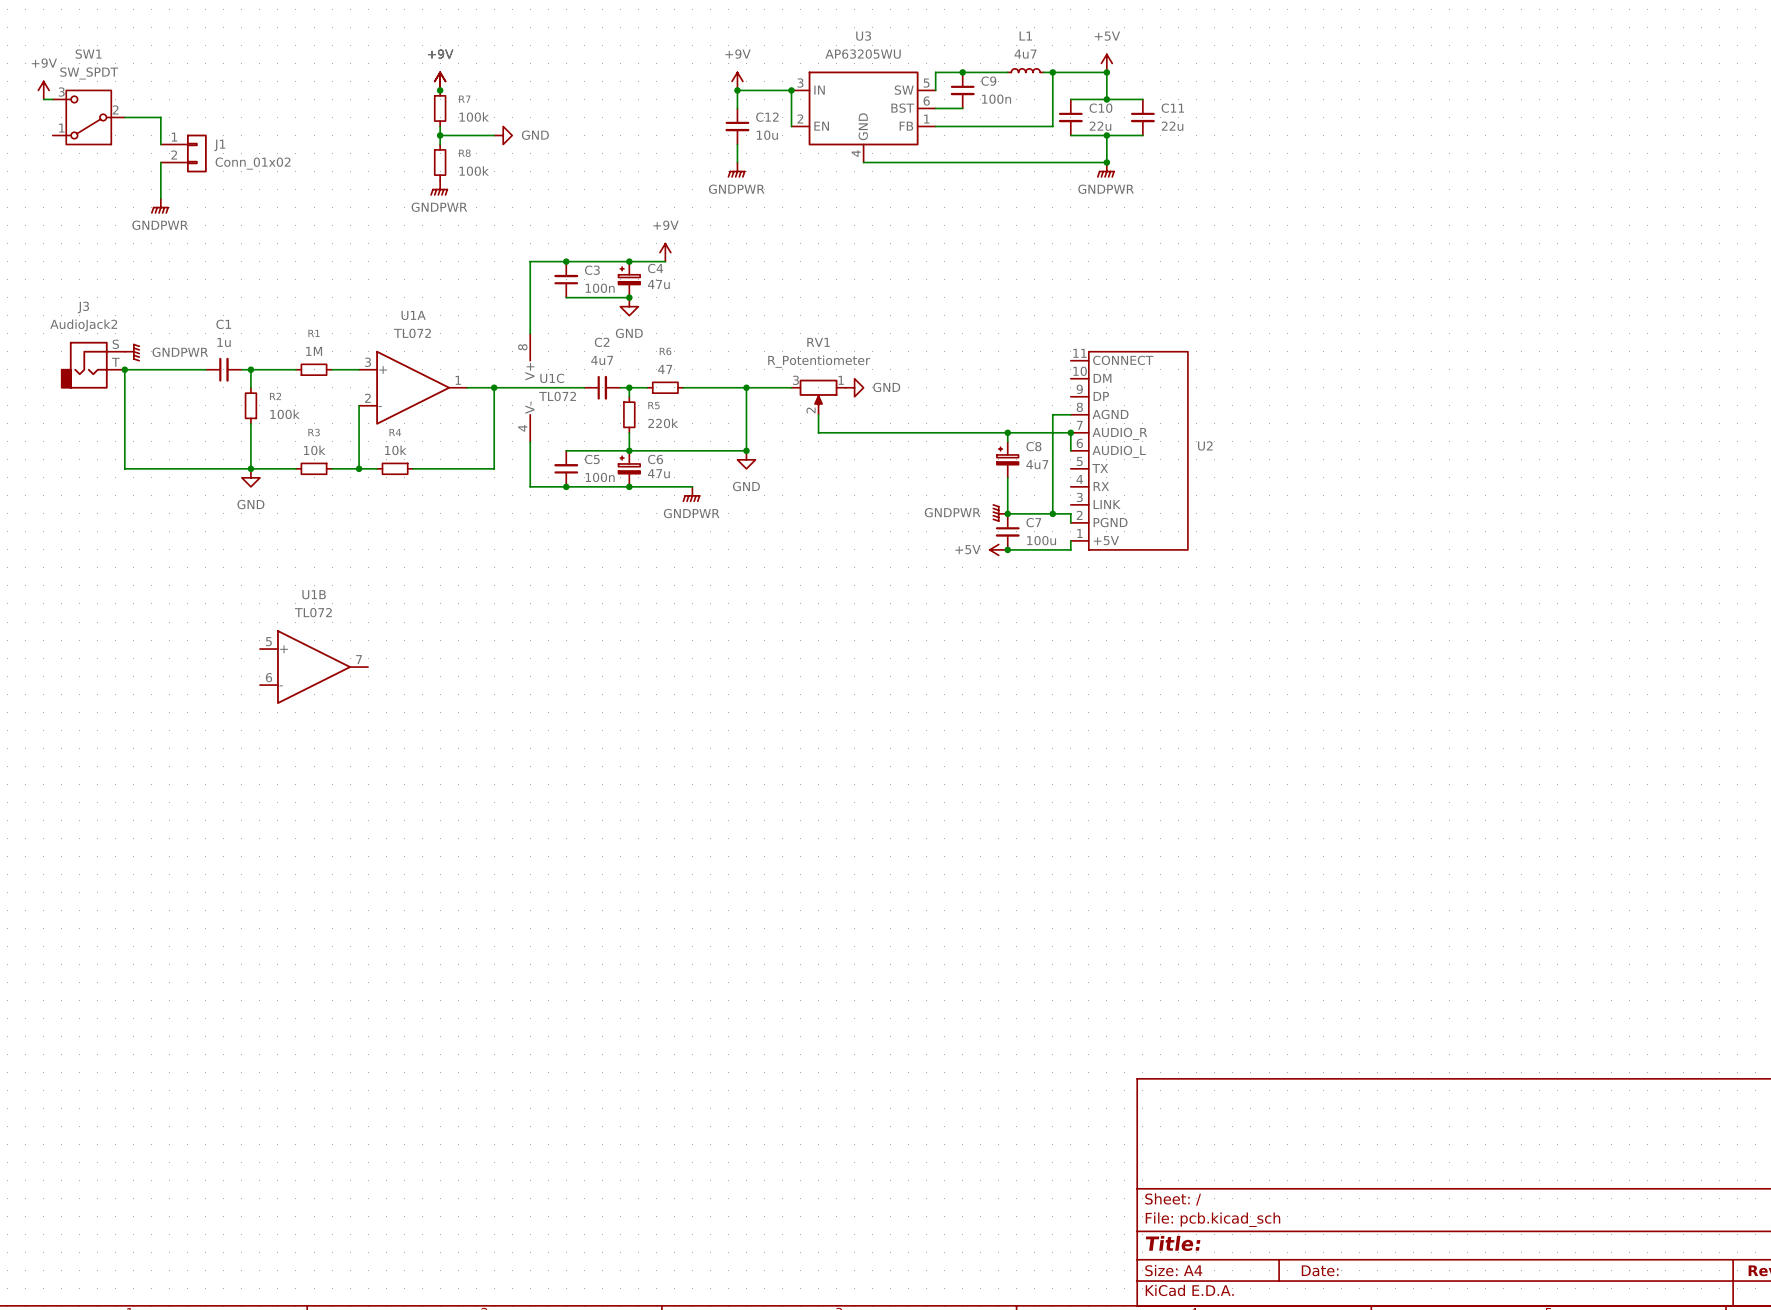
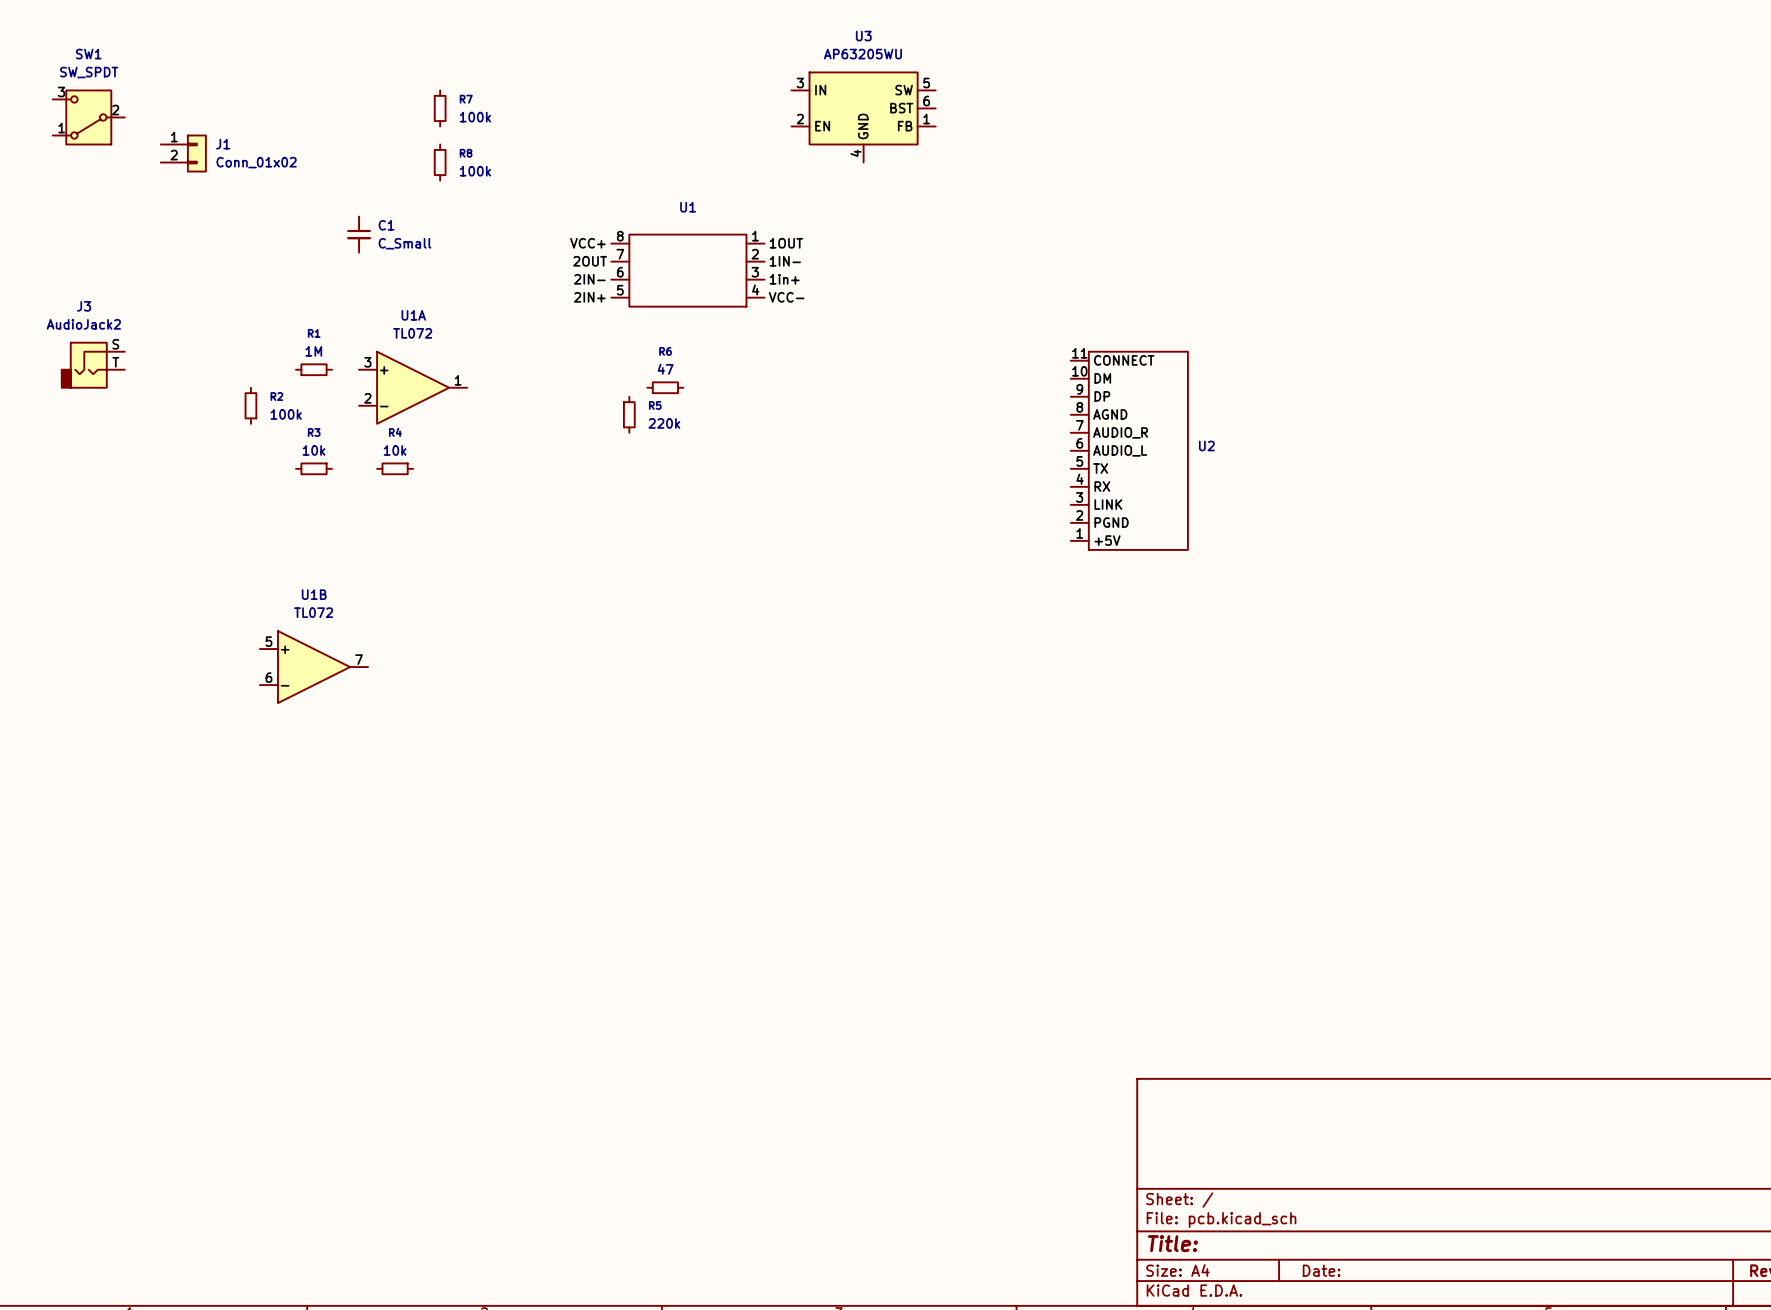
power symbol: +5V (1106, 63) -> none
L1: 4u7 (1025, 70) -> none
junction: (962, 72) -> none
wire: (1007, 72) (935, 72) (935, 90) -> none
wire: (1043, 72) (1106, 72) (1106, 99) -> none
wire: (1052, 72) (1052, 126) (935, 126) -> none
junction: (1052, 72) -> none
junction: (1106, 72) -> none
power symbol: +9V (440, 81) -> none
power symbol: +9V (737, 81) -> none
power symbol: +9V (43, 90) -> none
junction: (440, 90) -> none
junction: (737, 90) -> none
junction: (791, 90) -> none
C9: 100n (962, 90) -> none
wire: (43, 99) (52, 99) -> none
wire: (1070, 99) (1142, 99) -> none
junction: (1106, 99) -> none
wire: (737, 108) (737, 90) (791, 90) (791, 126) -> none
wire: (935, 108) (962, 108) -> none
wire: (124, 117) (160, 117) (160, 144) -> none
C10: 22u (1070, 117) -> none
C11: 22u (1142, 117) -> none
wire: (440, 126) (440, 144) -> none
C12: 10u (737, 126) -> none
wire: (440, 135) (494, 135) -> none
junction: (440, 135) -> none
power symbol: GND (503, 135) -> none
wire: (1070, 135) (1142, 135) -> none
wire: (1106, 135) (1106, 162) (863, 162) -> none
junction: (1106, 135) -> none
wire: (737, 144) (737, 162) -> none
wire: (160, 162) (160, 198) -> none
junction: (1106, 162) -> none
power symbol: GNDPWR (736, 170) -> none
power symbol: GNDPWR (1105, 170) -> none
power symbol: GNDPWR (439, 188) -> none
power symbol: GNDPWR (159, 206) -> none
power symbol: +9V (665, 252) -> none
junction: (566, 261) -> none
junction: (629, 261) -> none
wire: (665, 261) (530, 261) (530, 333) -> none
U1: none -> (687, 270)
C3: 100n (566, 279) -> none
C4: 47u (629, 279) -> none
wire: (566, 297) (629, 297) -> none
junction: (629, 297) -> none
power symbol: GND (629, 306) -> none
C1 name position: C1 (223, 324) -> C1 (386, 225)
C1 value: 1u (224, 342) -> C_Small (405, 243)
power symbol: GNDPWR (132, 352) -> none
junction: (124, 369) -> none
wire: (205, 369) (124, 369) (124, 468) (295, 468) -> none
C1 rotation: 0° (223, 369) -> 90° clockwise (359, 234)
C1 position: (223, 369) -> (359, 234)
wire: (241, 369) (295, 369) -> none
wire: (250, 369) (250, 387) -> none
junction: (250, 369) -> none
wire: (332, 369) (359, 369) -> none
wire: (467, 387) (584, 387) -> none
wire: (494, 387) (494, 468) (413, 468) -> none
junction: (494, 387) -> none
U1C: TL072 (530, 387) -> none
C2: 4u7 (602, 387) -> none
wire: (620, 387) (647, 387) -> none
wire: (629, 387) (629, 396) -> none
junction: (629, 387) -> none
wire: (683, 387) (791, 387) -> none
wire: (746, 387) (746, 450) (566, 450) -> none
junction: (746, 387) -> none
power symbol: GND (854, 387) -> none
RV1: R_Potentiometer (818, 397) -> none
wire: (359, 405) (359, 468) -> none
wire: (818, 414) (818, 432) (1070, 432) (1070, 450) -> none
wire: (1070, 414) (1052, 414) (1052, 513) -> none
wire: (250, 423) (250, 468) -> none
wire: (629, 432) (629, 450) -> none
wire: (1007, 432) (1007, 441) -> none
junction: (1007, 432) -> none
junction: (1070, 432) -> none
wire: (530, 441) (530, 486) (692, 486) -> none
junction: (629, 450) -> none
junction: (746, 450) -> none
power symbol: GND (746, 459) -> none
C8: 4u7 (1007, 459) -> none
junction: (250, 468) -> none
wire: (332, 468) (377, 468) -> none
junction: (359, 468) -> none
C5: 100n (566, 468) -> none
C6: 47u (629, 468) -> none
power symbol: GND (250, 477) -> none
wire: (1007, 477) (1007, 513) (1070, 513) (1070, 522) -> none
junction: (566, 486) -> none
junction: (629, 486) -> none
power symbol: GNDPWR (691, 494) -> none
power symbol: GNDPWR (1000, 512) -> none
junction: (1007, 513) -> none
junction: (1052, 513) -> none
C7: 100u (1007, 531) -> none
wire: (1070, 540) (1070, 549) (1007, 549) -> none
power symbol: +5V (998, 549) -> none
junction: (1007, 549) -> none

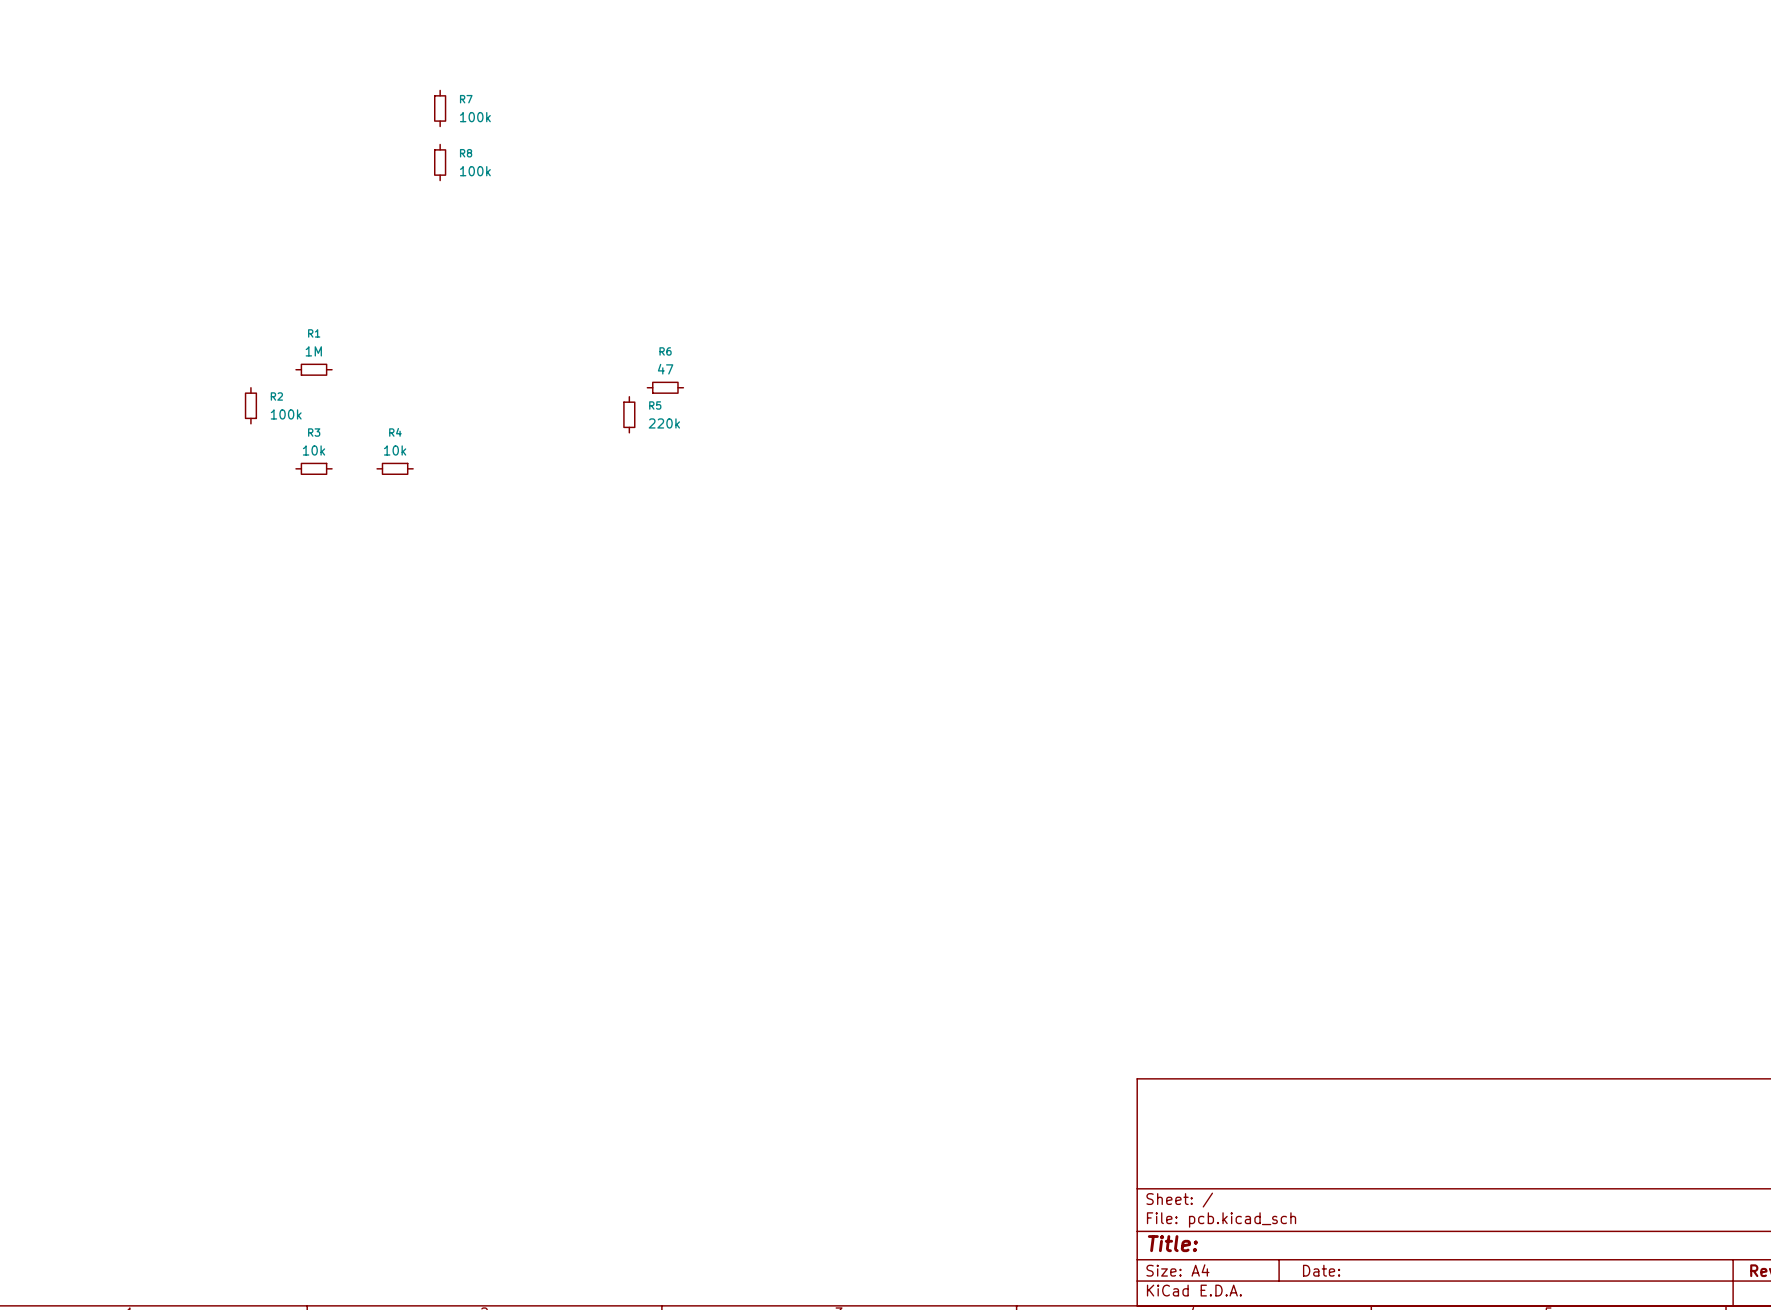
SW1: SW_SPDT (88, 117) -> none
U3: AP63205WU (863, 117) -> none
J1: Conn_01x02 (183, 153) -> none
C1: C_Small (359, 234) -> none
U1: (687, 270) -> none
J3: AudioJack2 (92, 365) -> none
U1A: TL072 (413, 387) -> none
U2: (1129, 450) -> none
U1B: TL072 (314, 667) -> none

